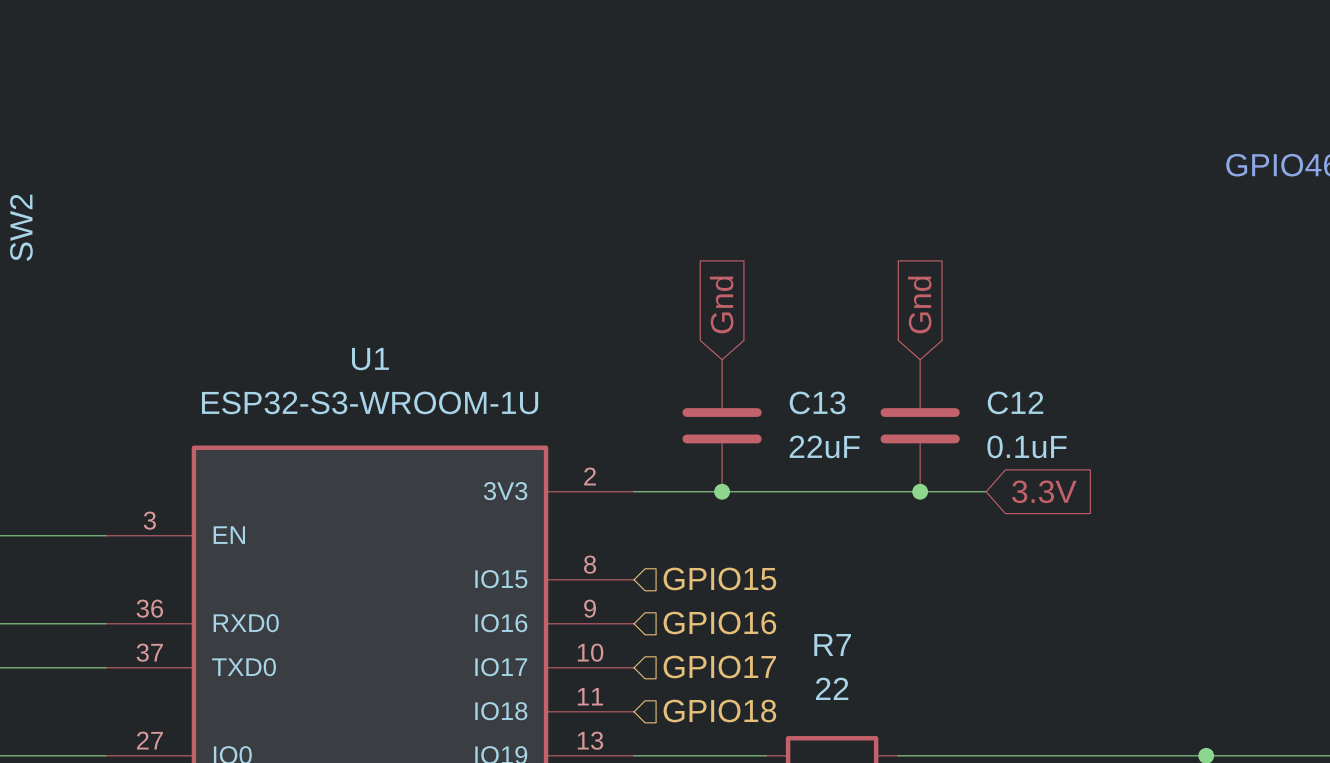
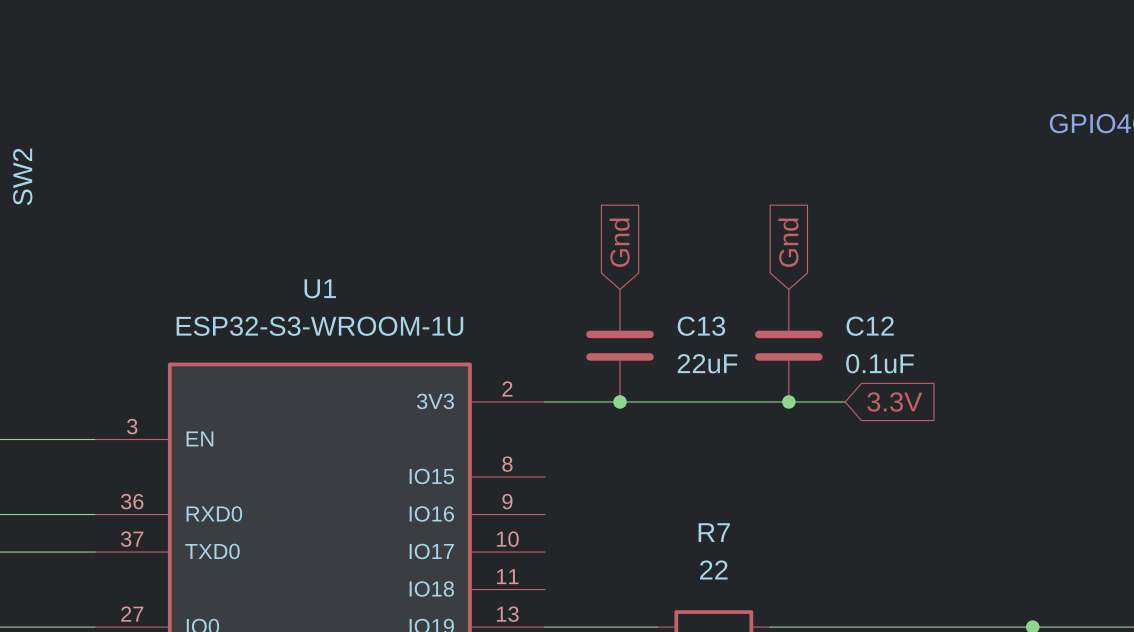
hierarchical label: GPIO15 (719, 578) -> none
hierarchical label: GPIO16 (719, 622) -> none
hierarchical label: GPIO17 (719, 666) -> none
hierarchical label: GPIO18 (719, 711) -> none

